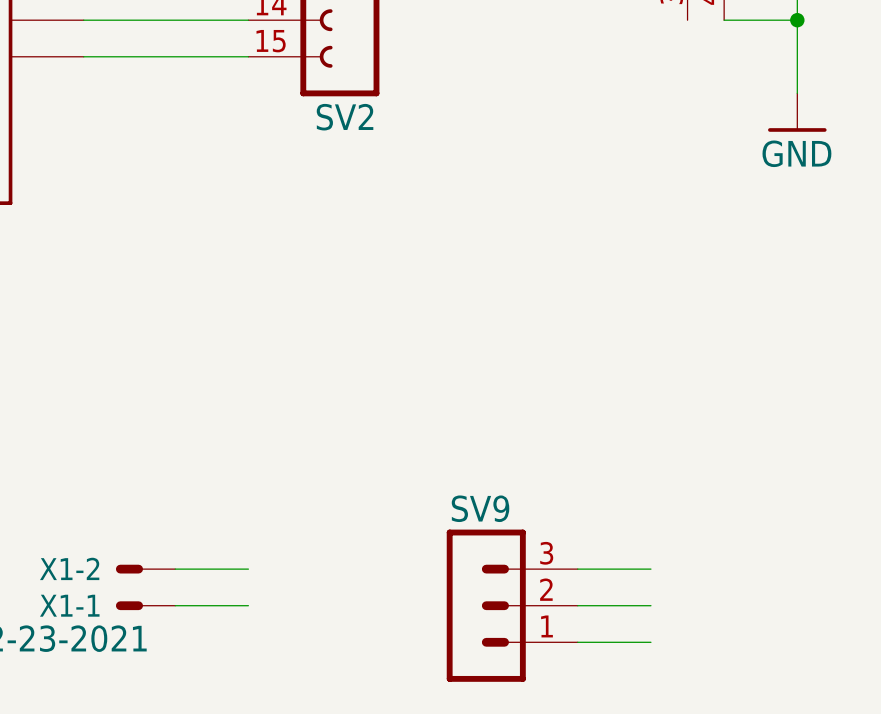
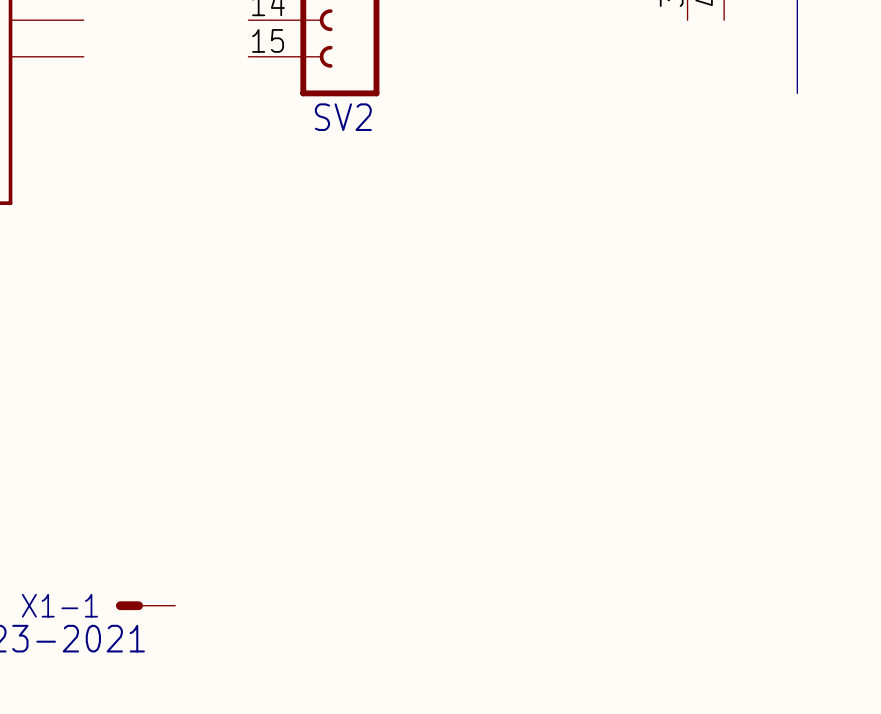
wire: (83, 20) (248, 20) -> none
wire: (724, 20) (797, 20) -> none
junction: (797, 20) -> none
wire: (83, 56) (248, 56) -> none
power symbol: GND (797, 112) -> none
X1-2: (145, 569) -> none
wire: (175, 569) (248, 569) -> none
wire: (577, 569) (650, 569) -> none
wire: (175, 605) (248, 605) -> none
SV9: (512, 605) -> none
wire: (577, 605) (650, 605) -> none
wire: (577, 642) (650, 642) -> none

